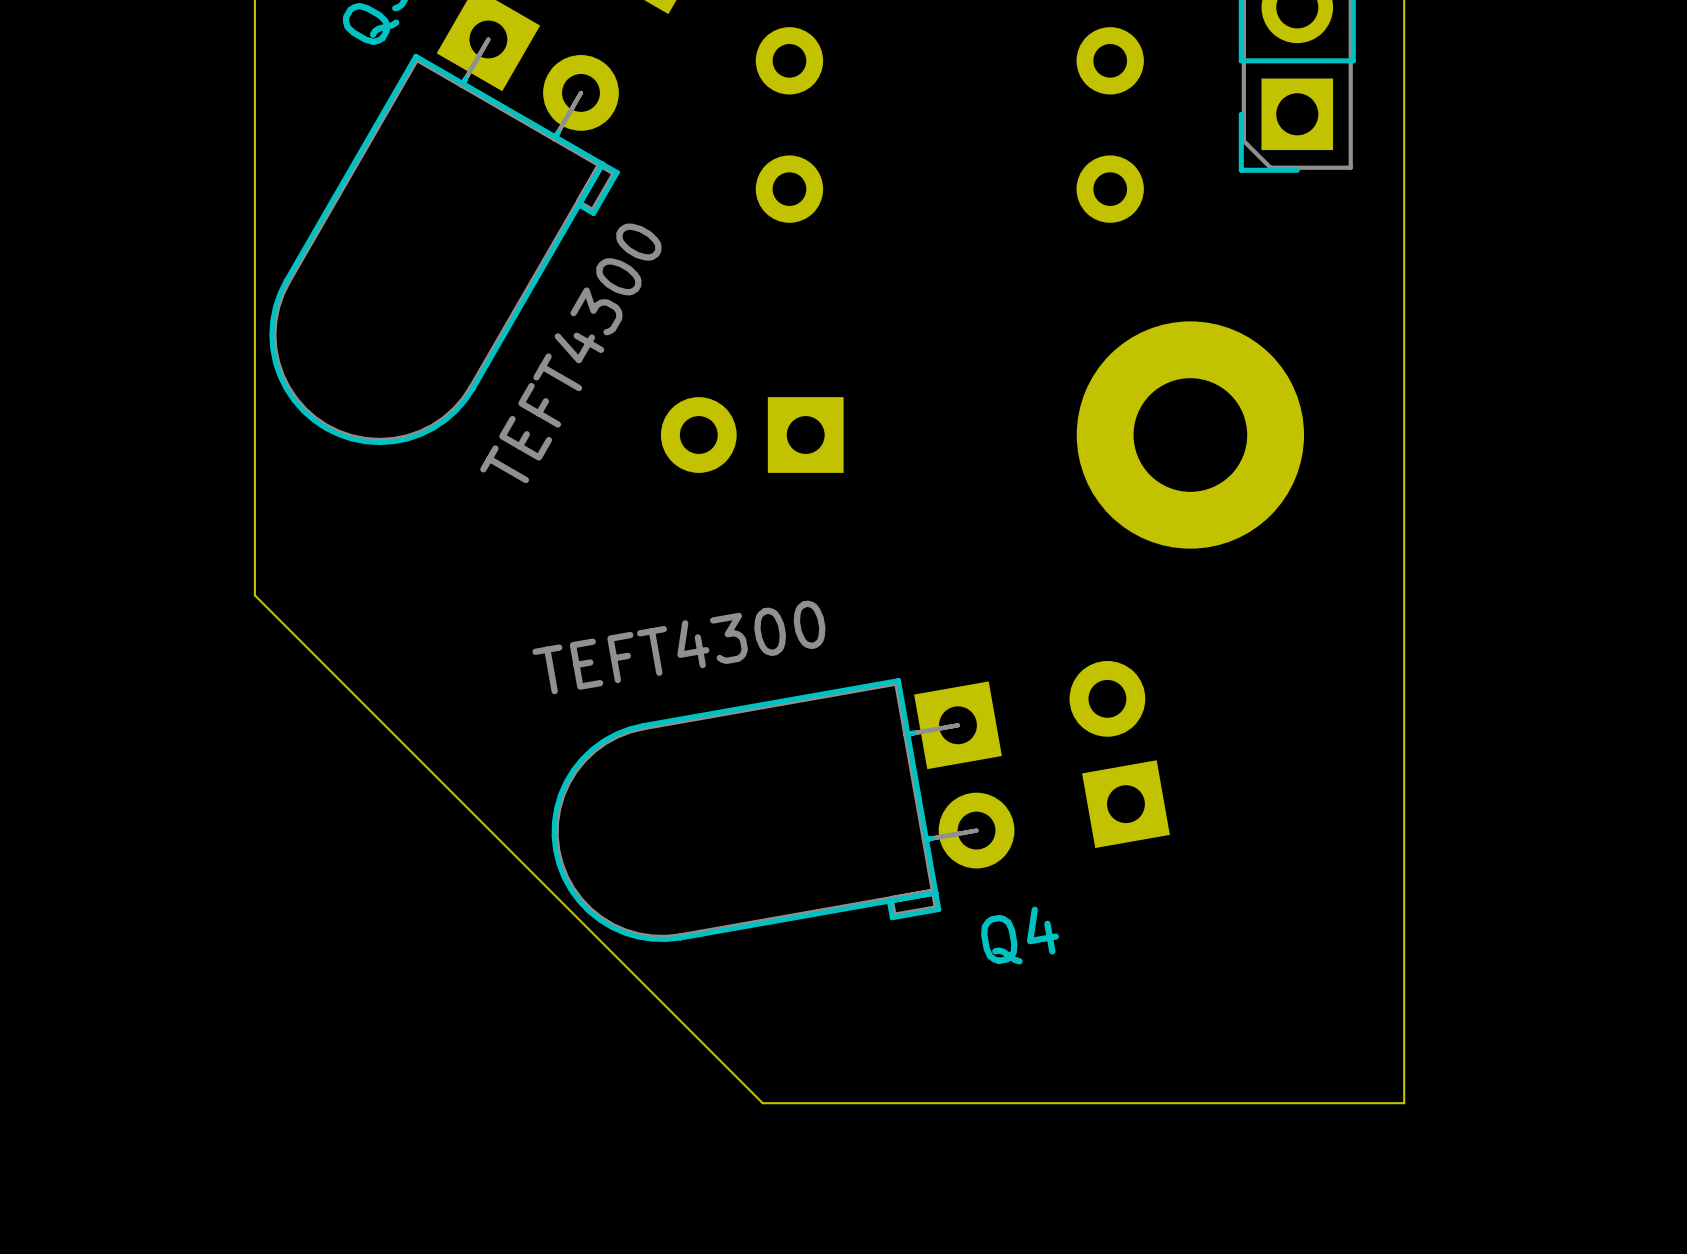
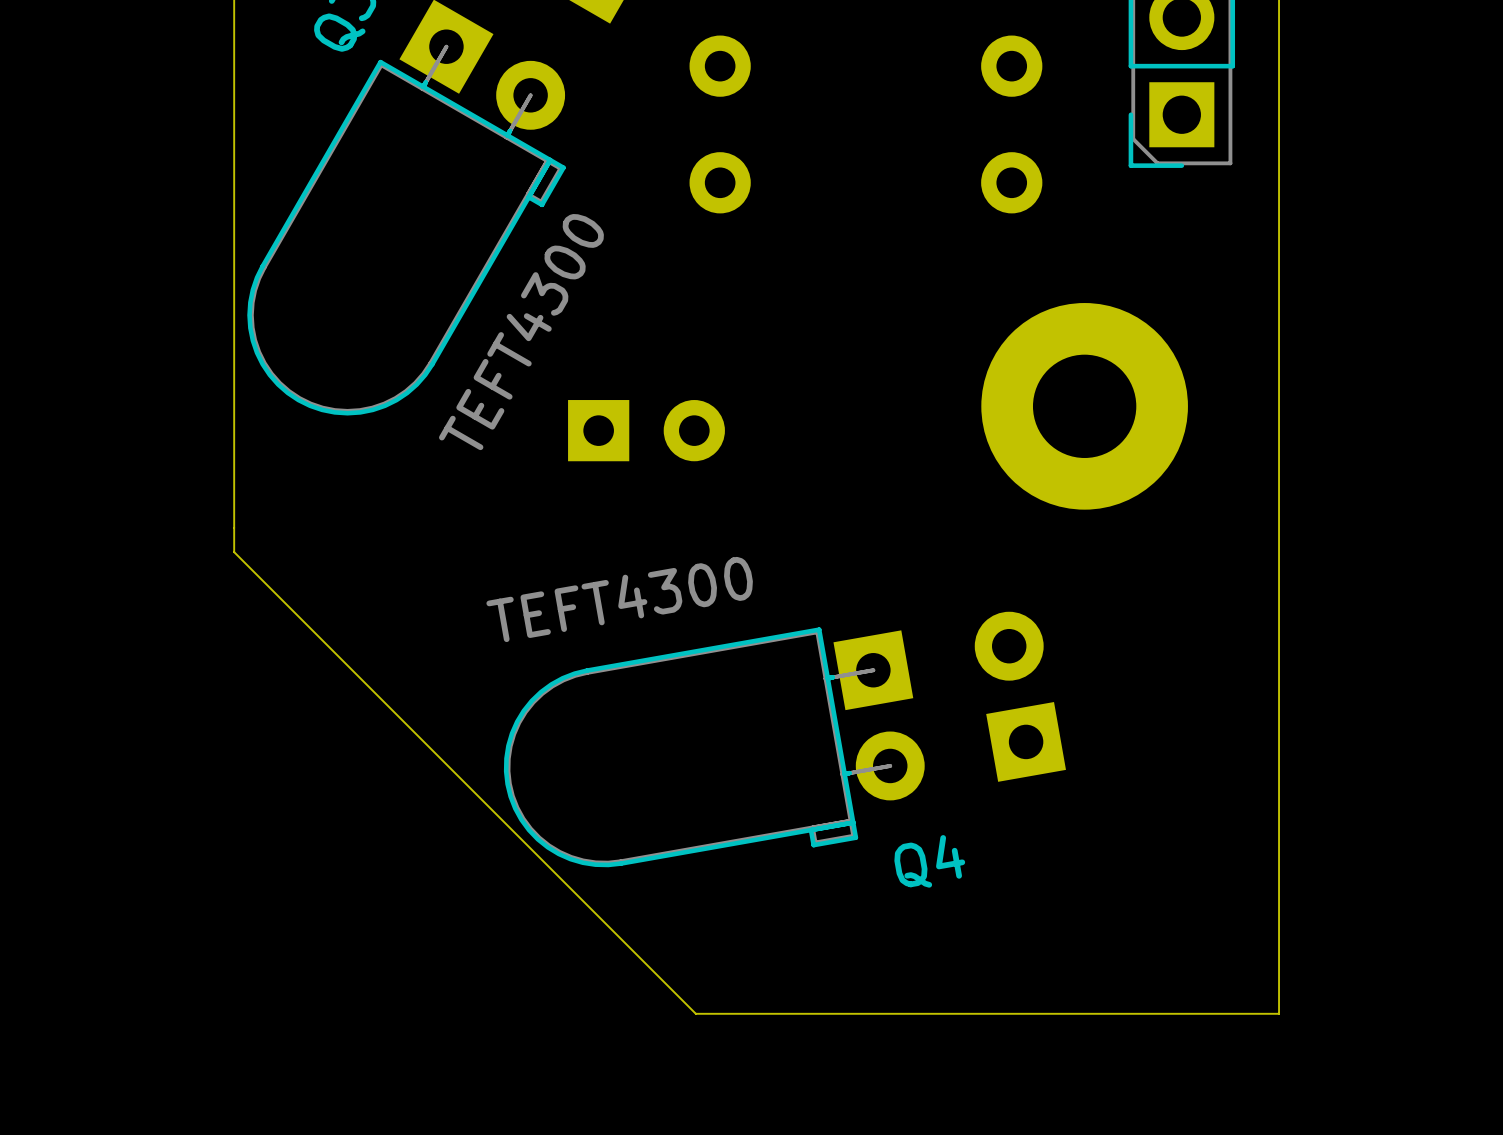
part: (752, 435) -> none
part: none -> (646, 430)

